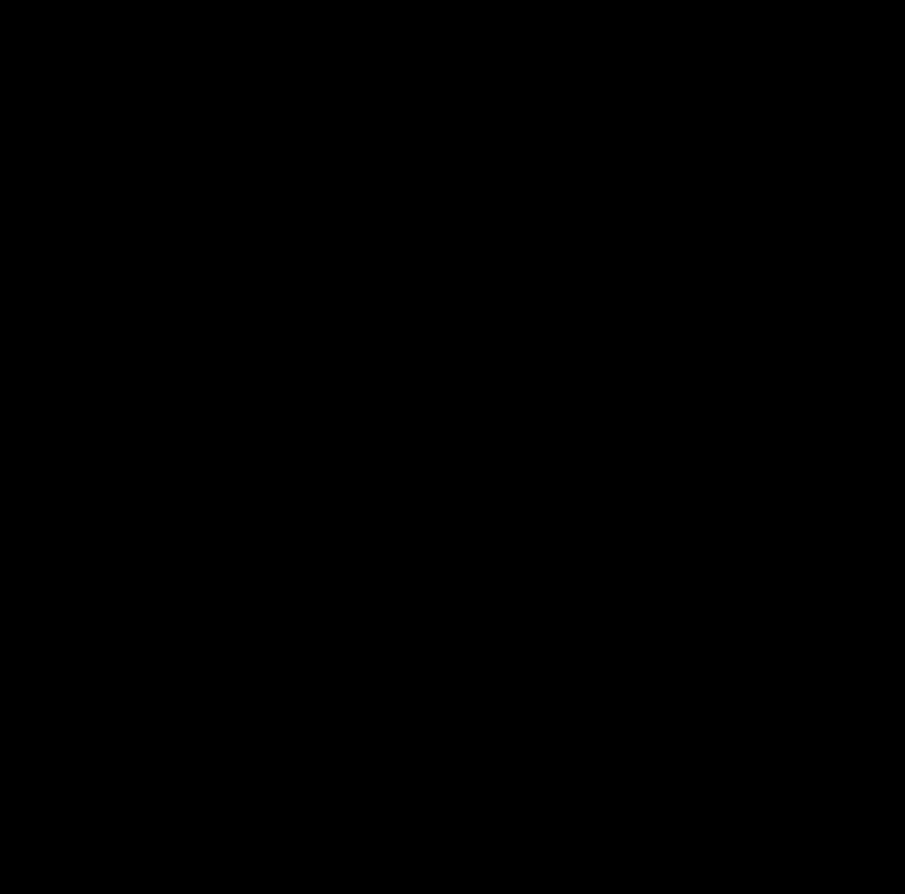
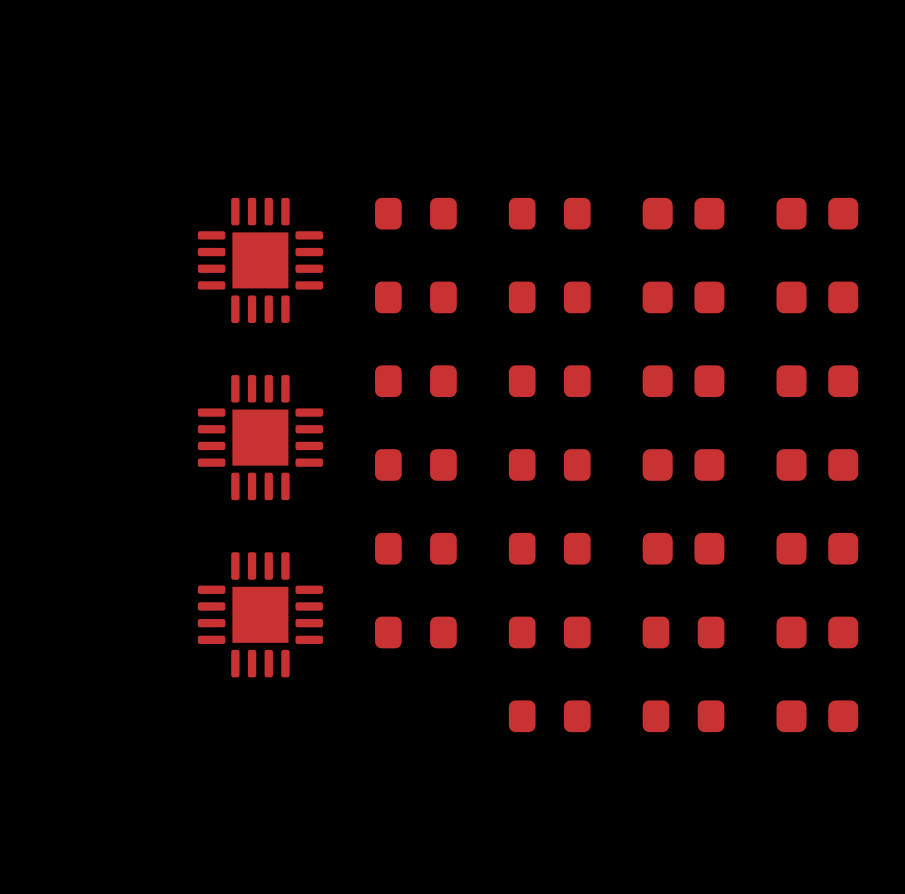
part: none -> (415, 213)
part: none -> (549, 213)
part: none -> (683, 213)
part: none -> (817, 213)
part: none -> (260, 260)
part: none -> (415, 297)
part: none -> (549, 297)
part: none -> (683, 297)
part: none -> (817, 297)
part: none -> (415, 381)
part: none -> (549, 381)
part: none -> (683, 381)
part: none -> (817, 381)
part: none -> (260, 437)
part: none -> (415, 464)
part: none -> (549, 464)
part: none -> (683, 464)
part: none -> (817, 464)
part: none -> (415, 548)
part: none -> (549, 548)
part: none -> (683, 548)
part: none -> (817, 548)
part: none -> (260, 614)
part: none -> (415, 632)
part: none -> (549, 632)
part: none -> (683, 632)
part: none -> (817, 632)
part: none -> (549, 716)
part: none -> (683, 716)
part: none -> (817, 716)

